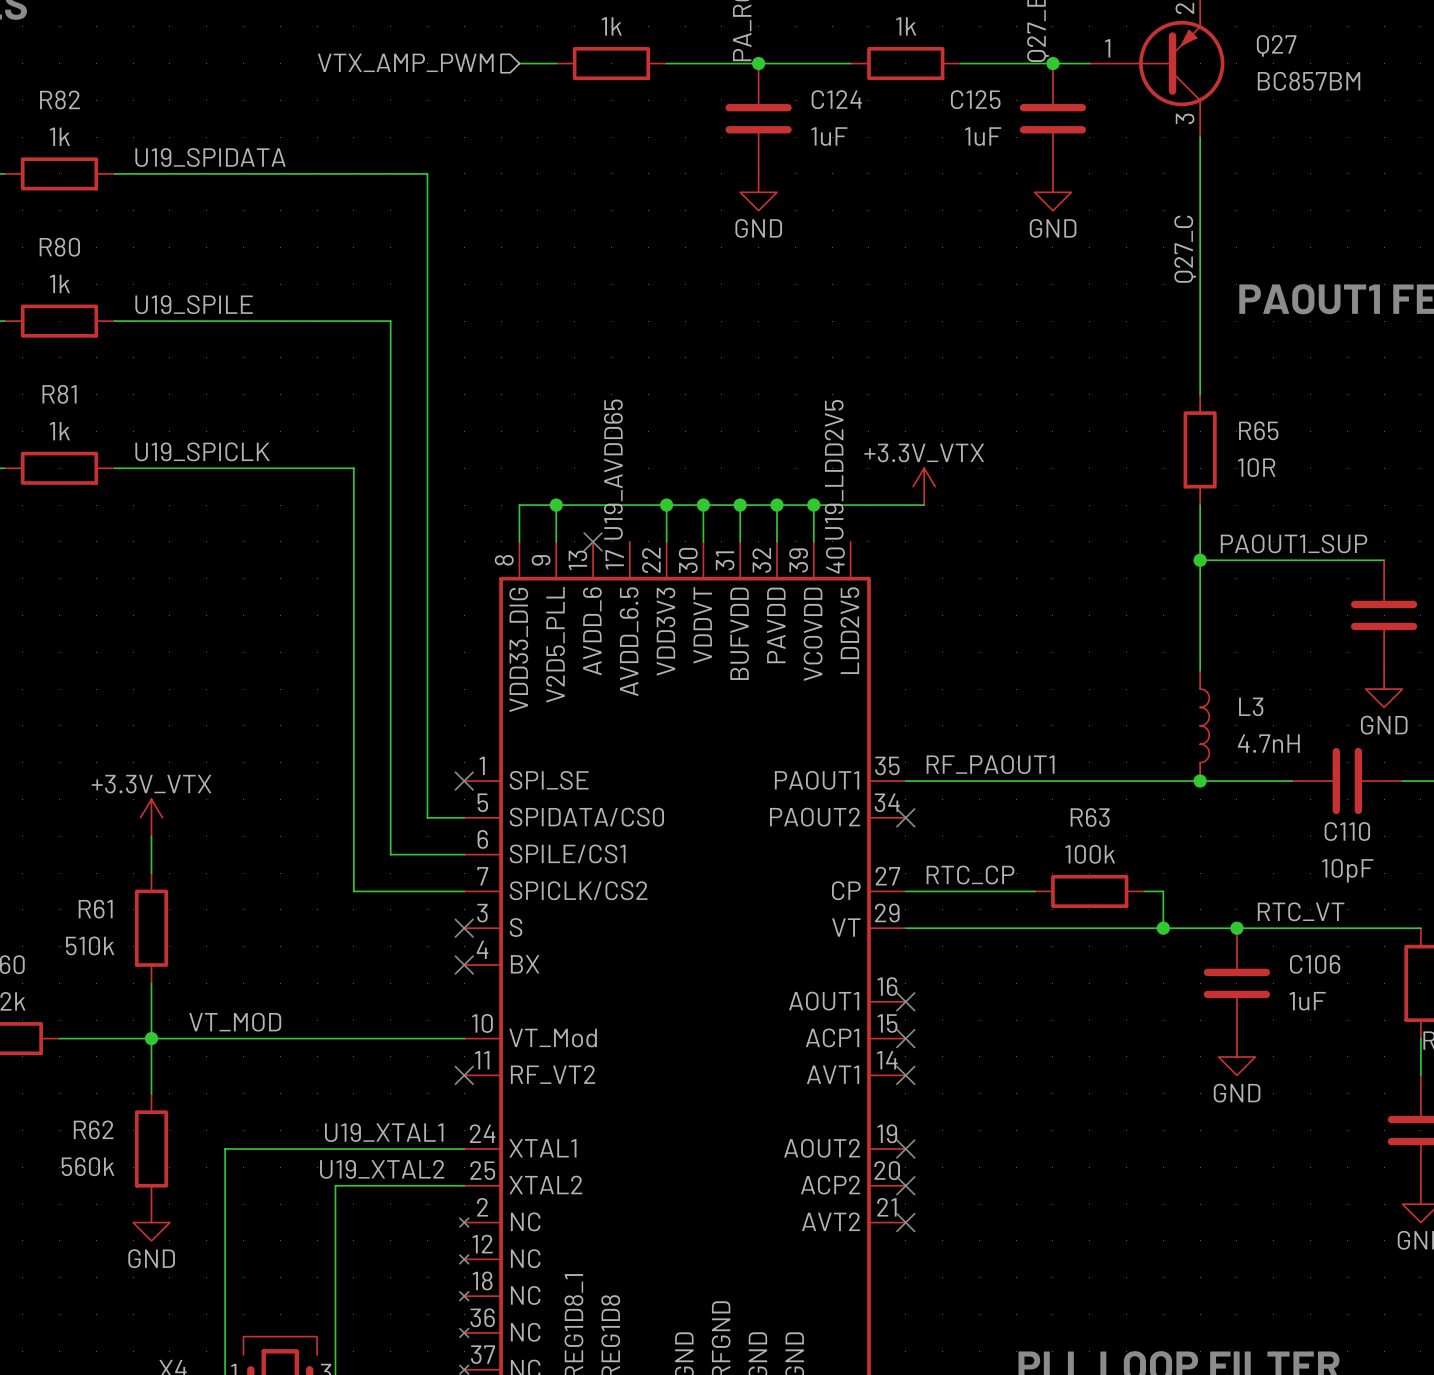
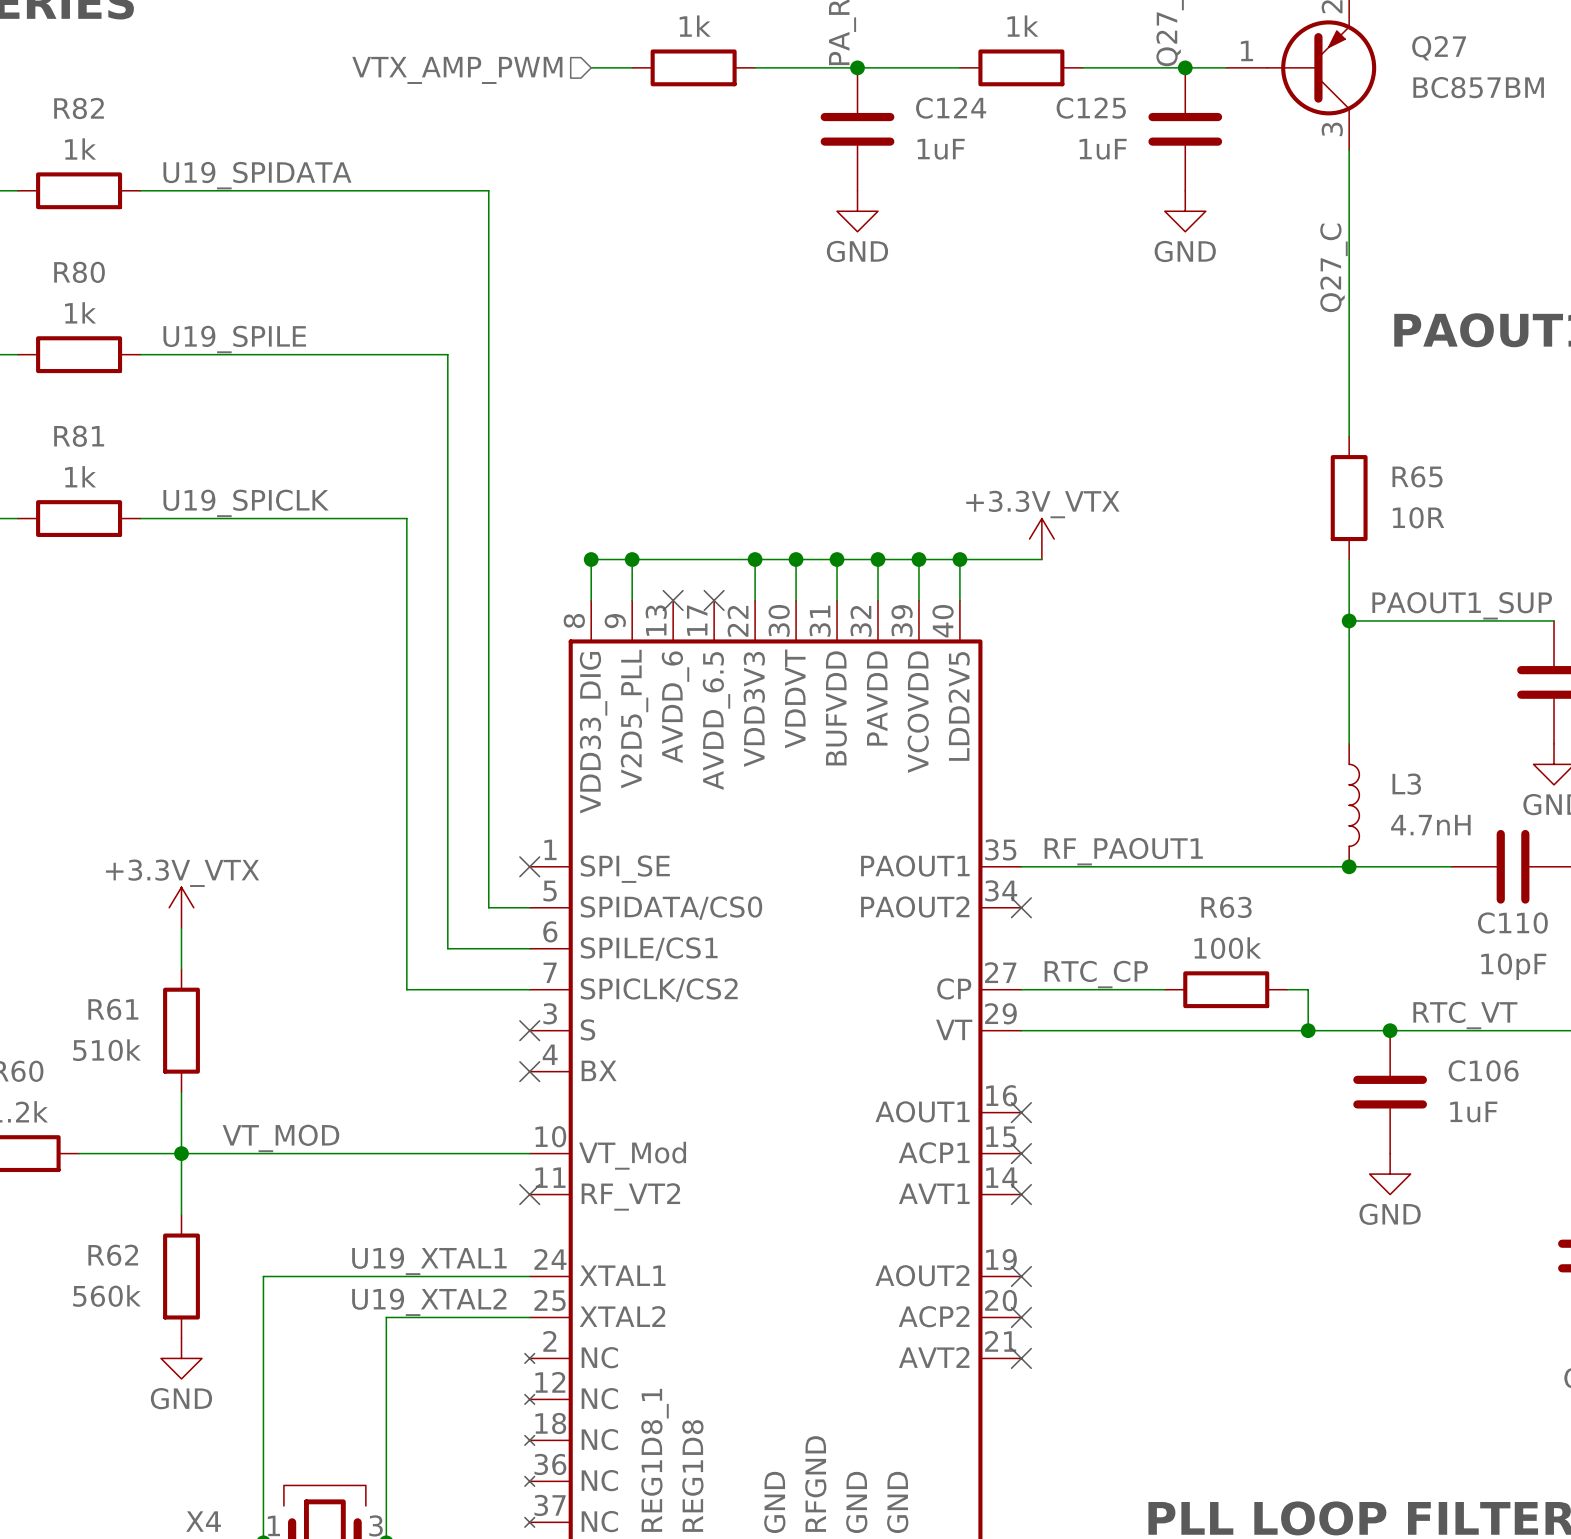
label: U19_AVDD65 (613, 469) -> none
label: U19_LDD2V5 (834, 469) -> none
junction: none -> (591, 559)
wire: none -> (959, 559) (959, 600)
junction: none -> (959, 559)
no-connect mark: none -> (714, 600)

